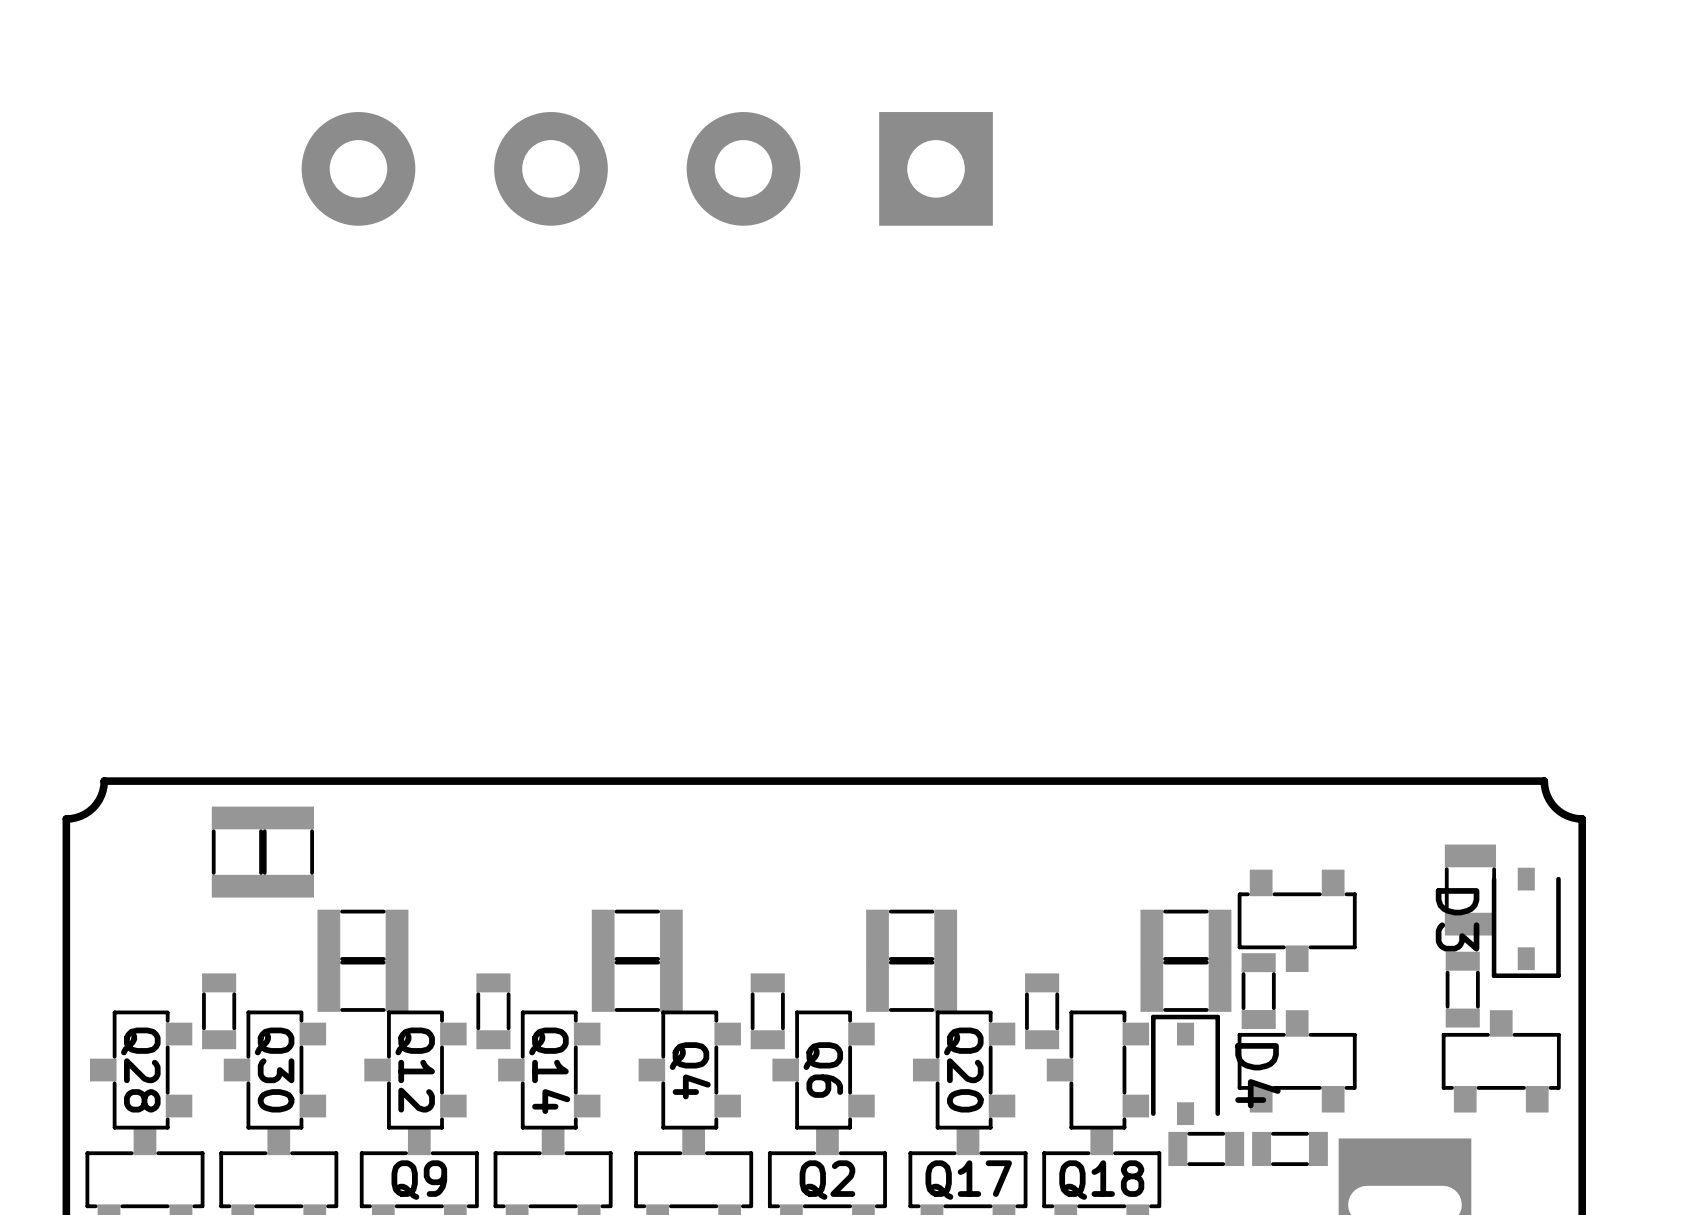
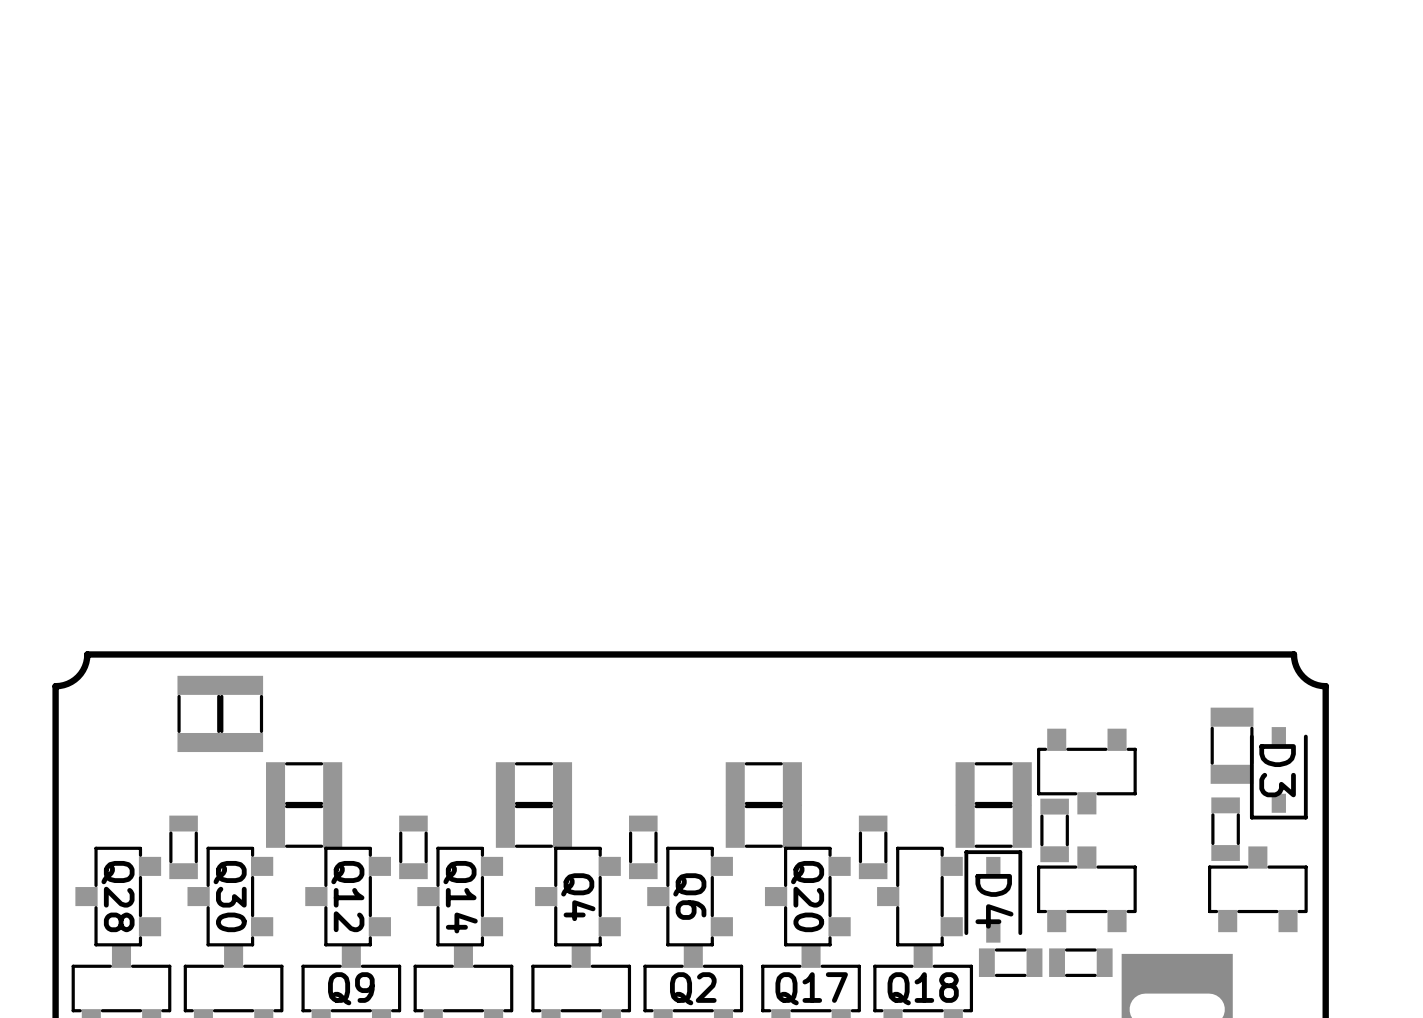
part: (647, 168) -> none
D3 name position: D3 (1457, 919) -> D3 (1277, 770)
D4 name position: D4 (1257, 1075) -> D4 (994, 901)

